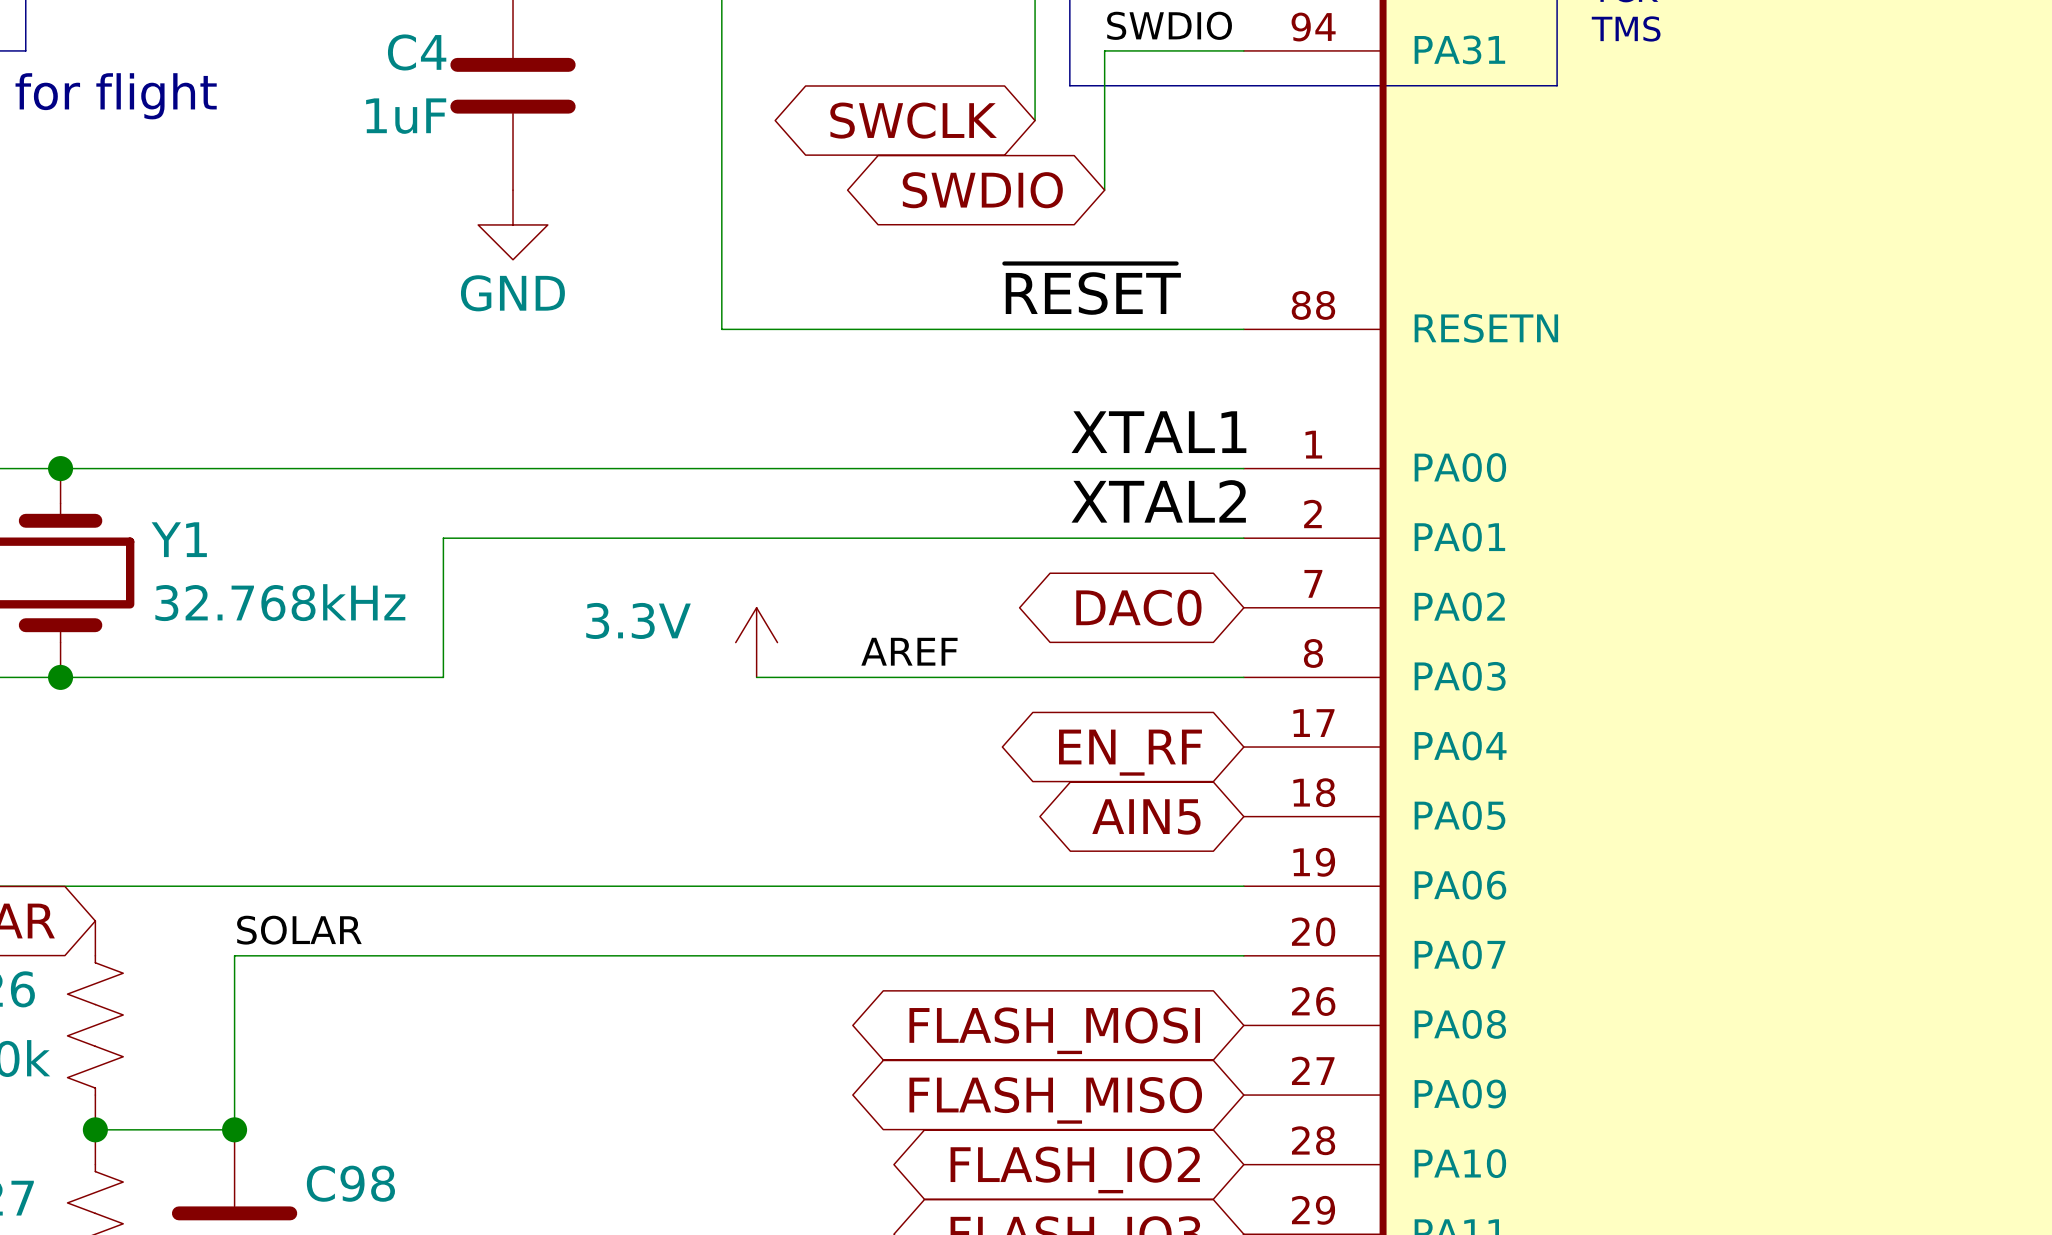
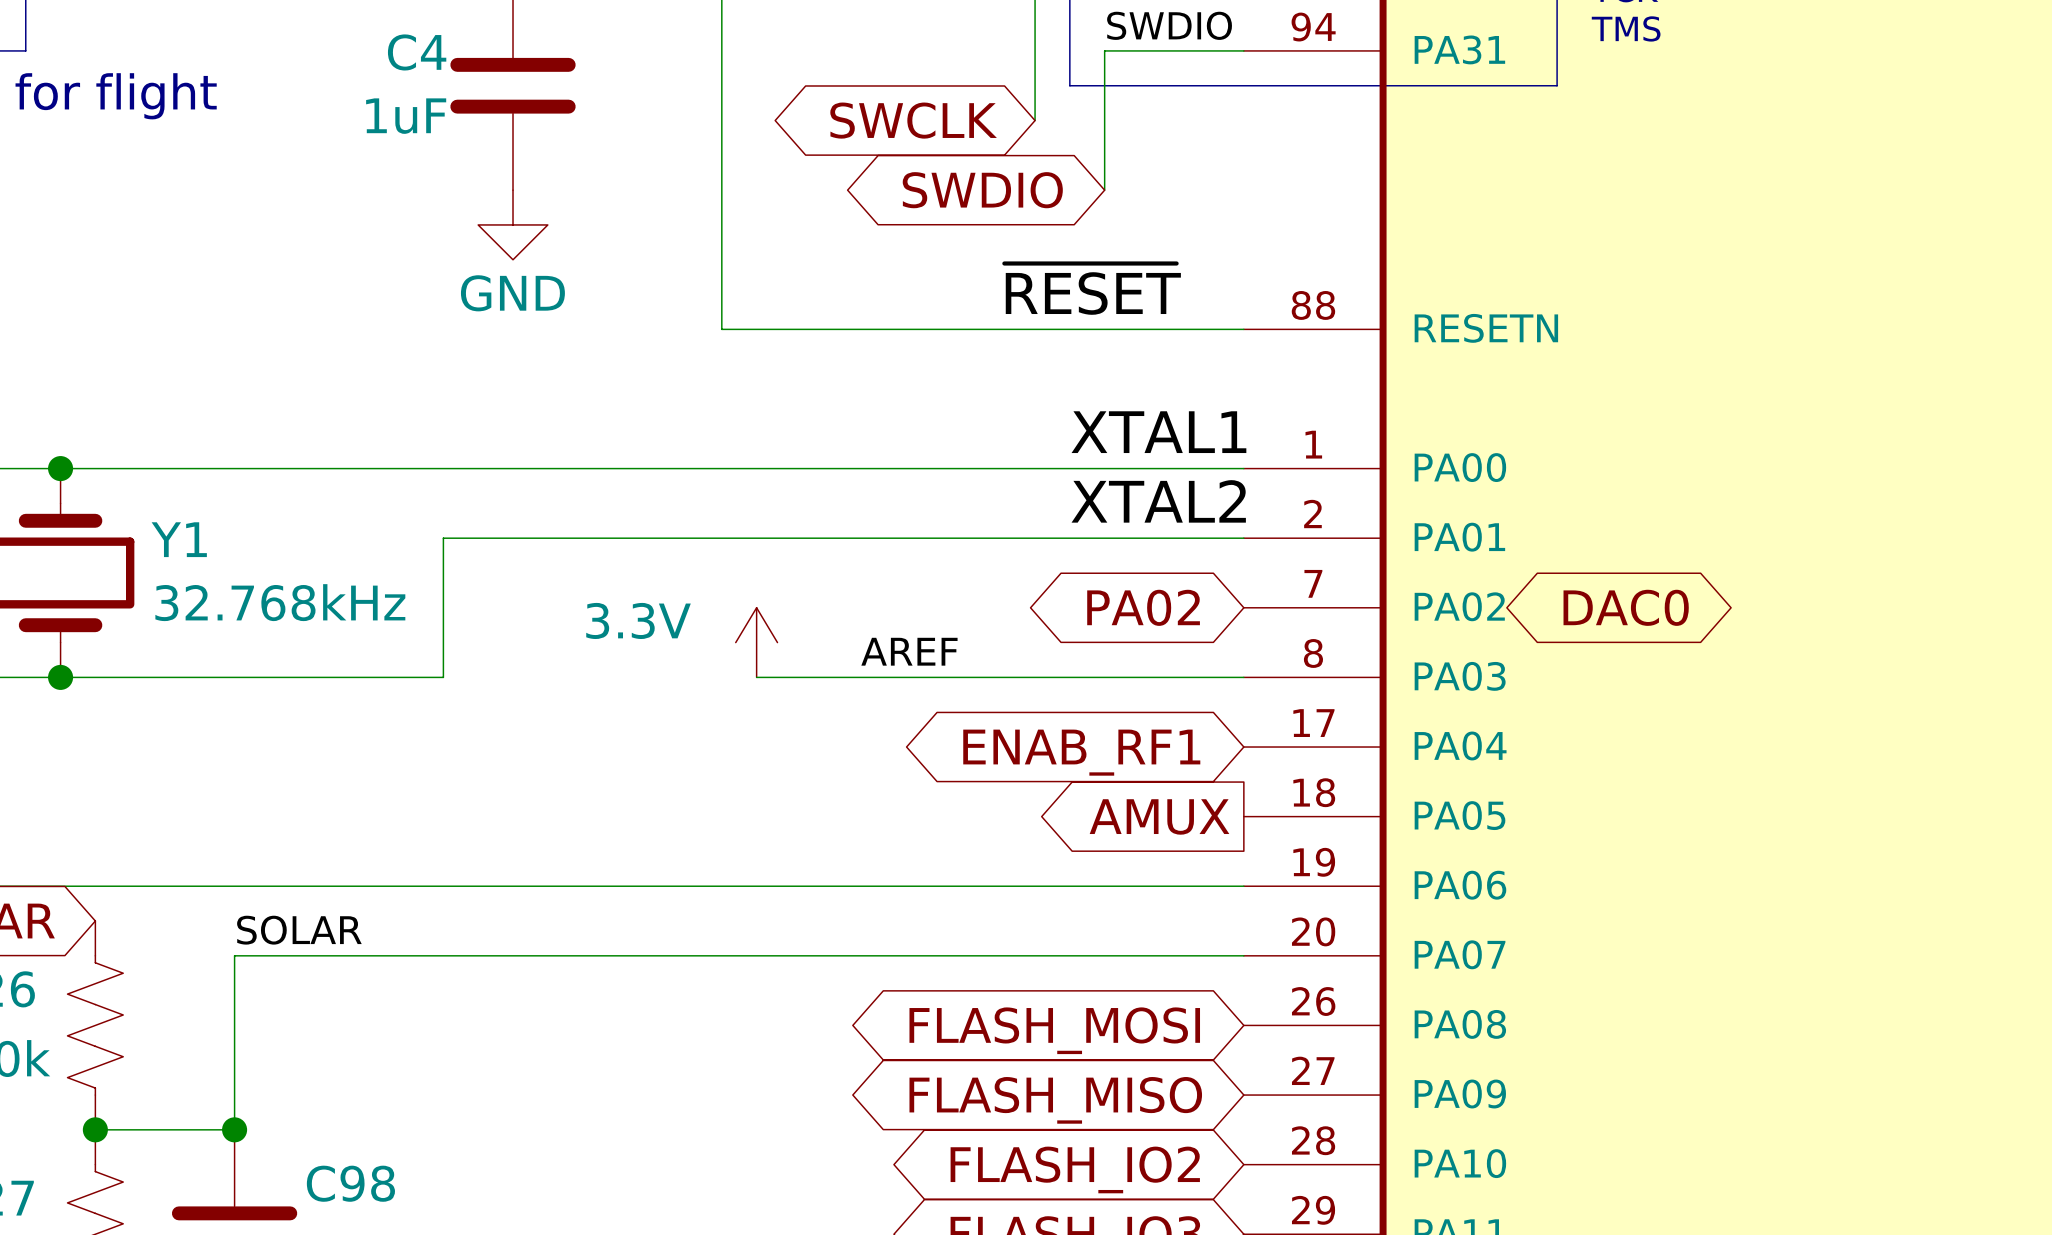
global label: DAC0 (1138, 607) -> PA02 (1143, 607)
global label: none -> DAC0 (1626, 607)
global label: EN_RF (1130, 752) -> ENAB_RF1 (1081, 752)
global label shape: bidirectional (1146, 816) -> output (1159, 816)
global label: AIN5 (1146, 816) -> AMUX (1159, 816)

